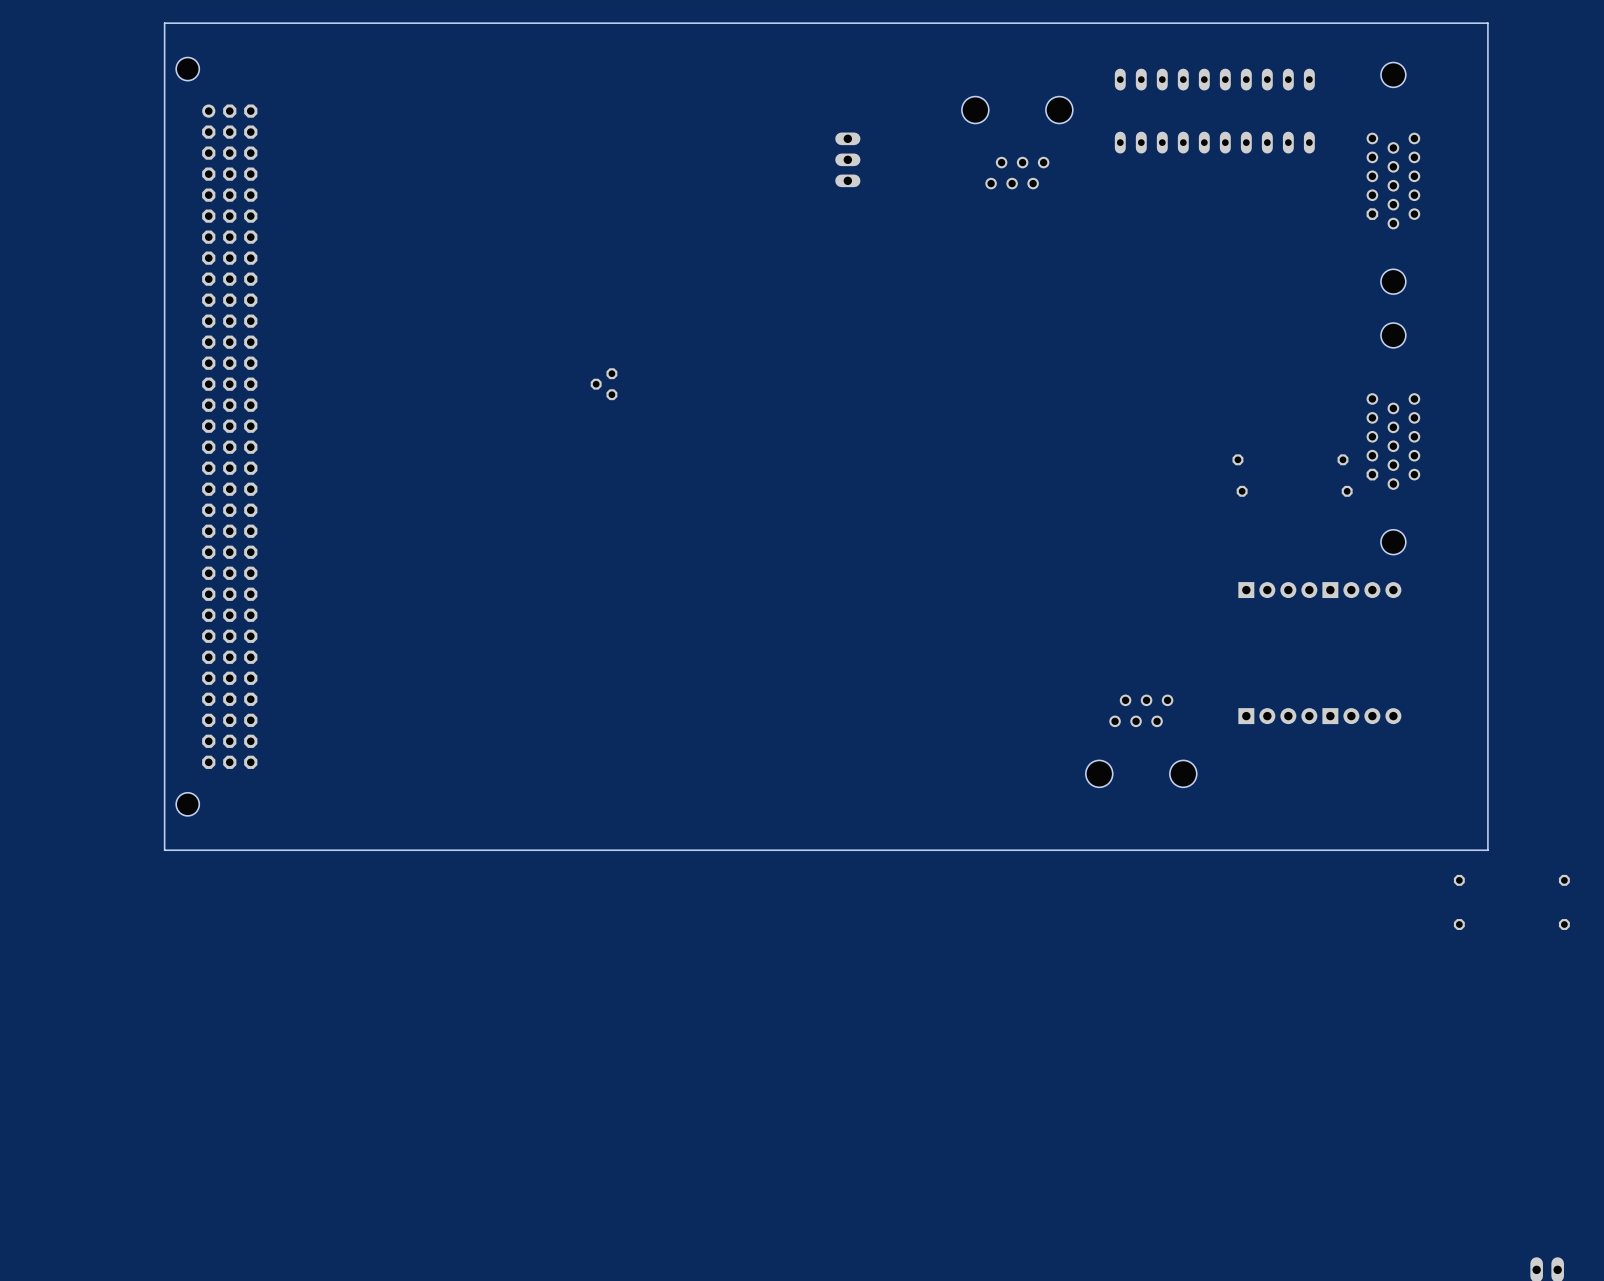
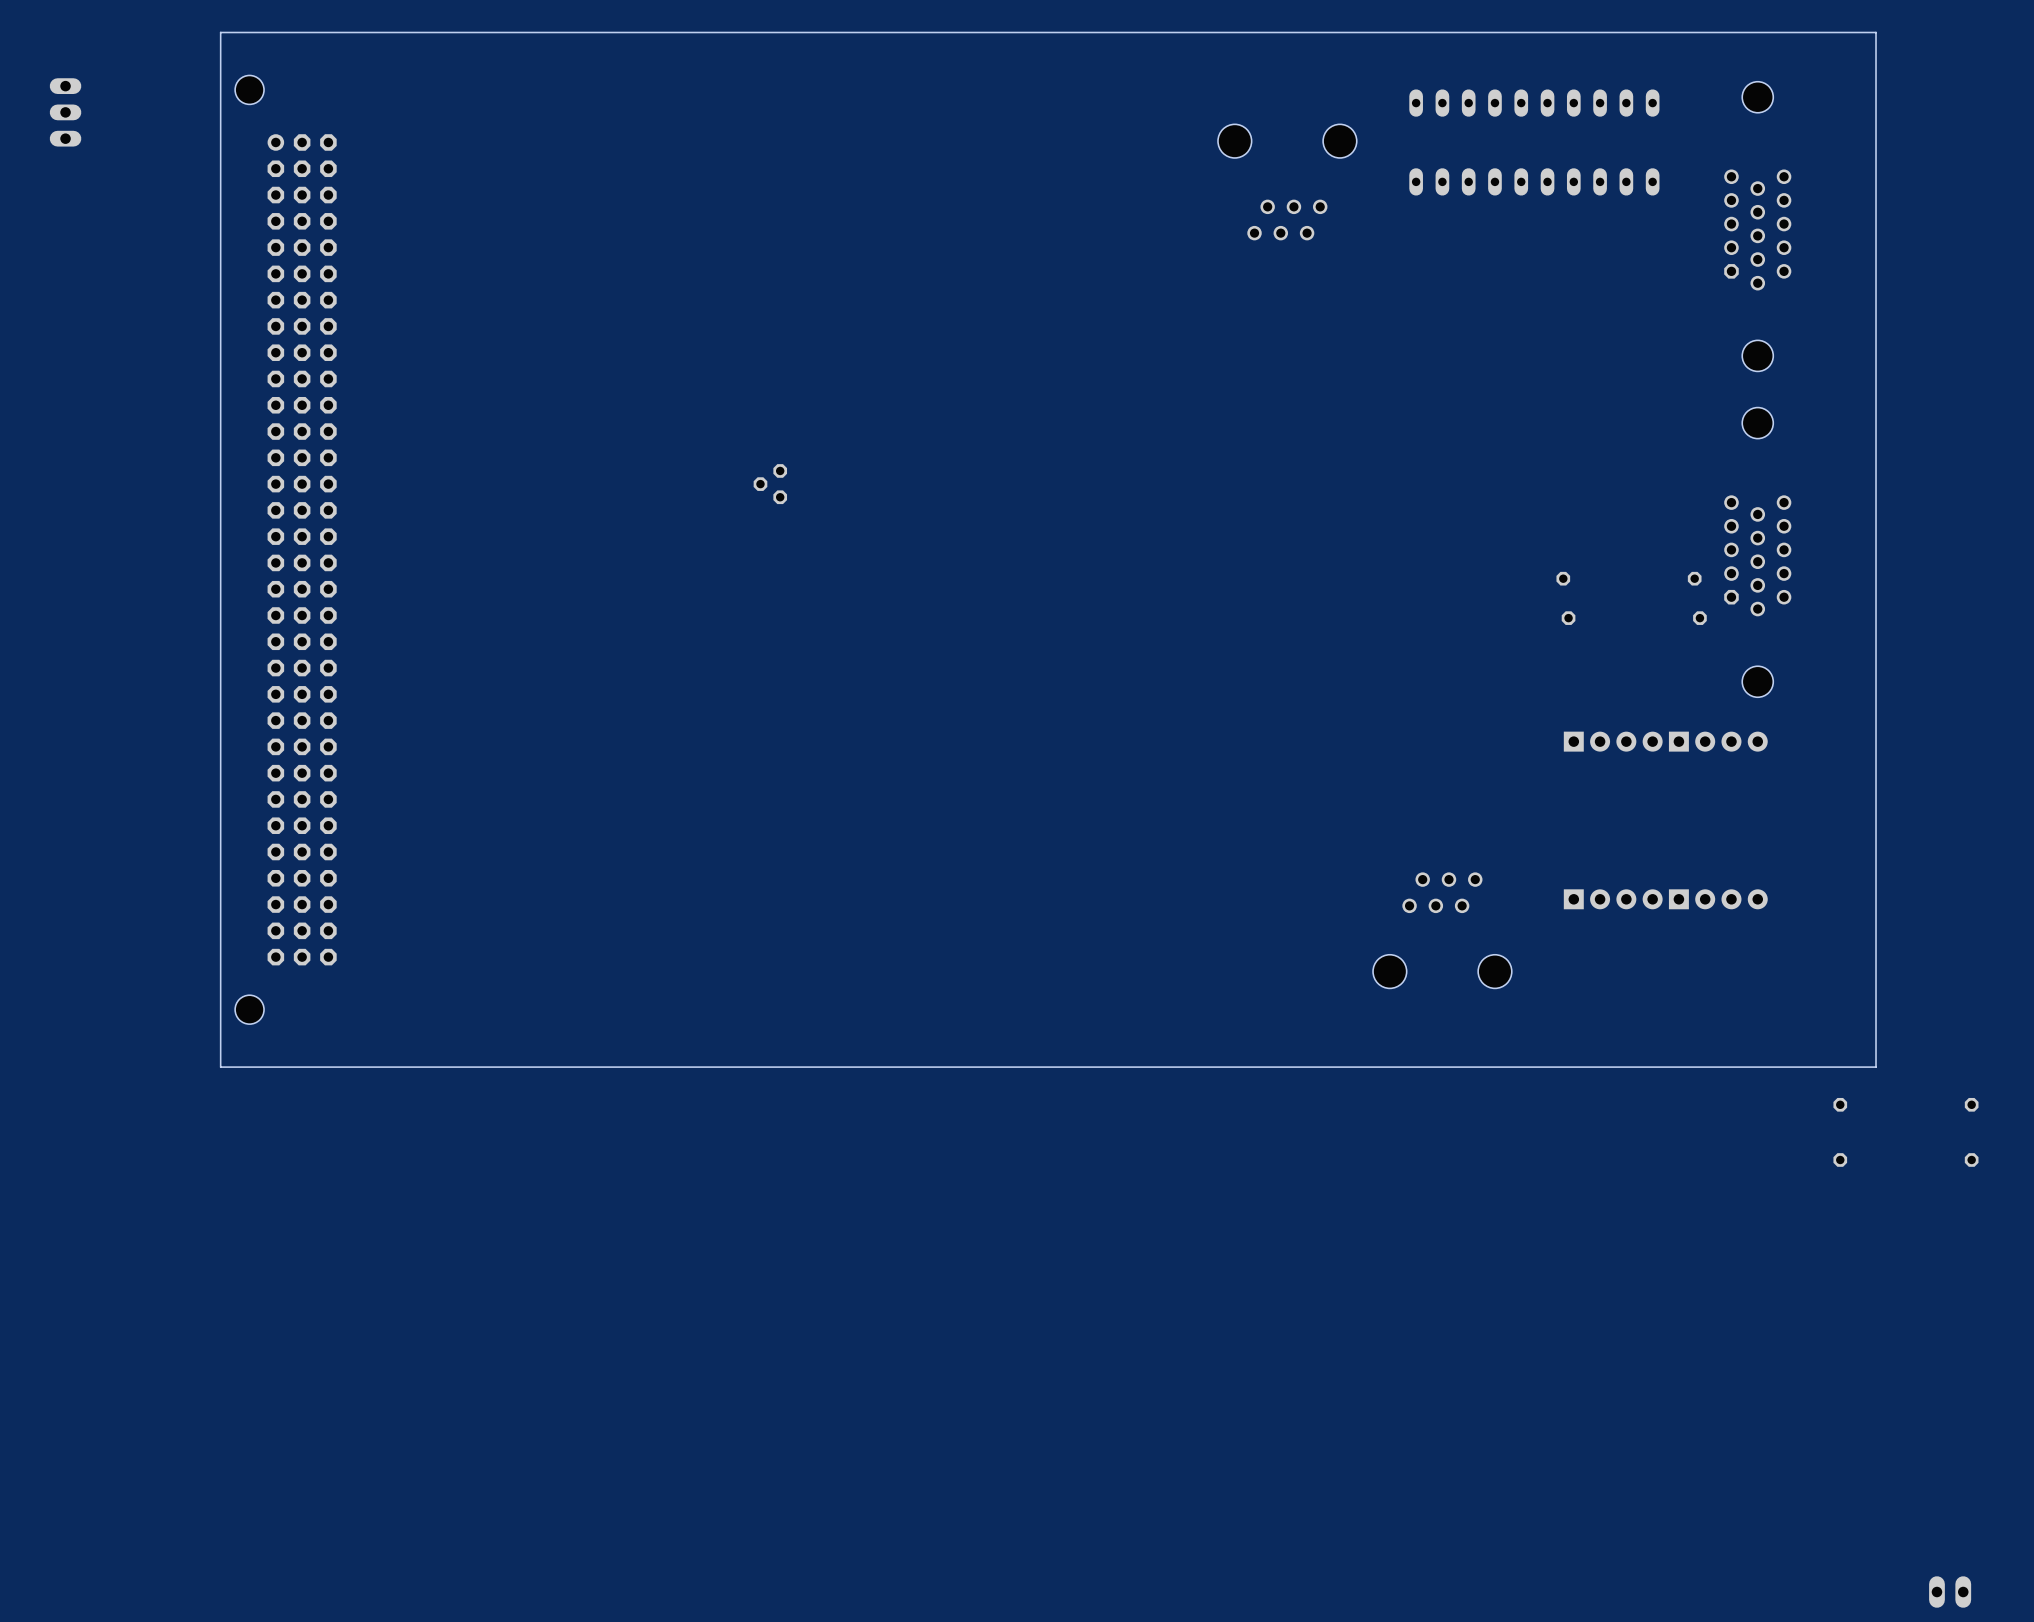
part: none -> (65, 112)
part: (847, 159) -> none

